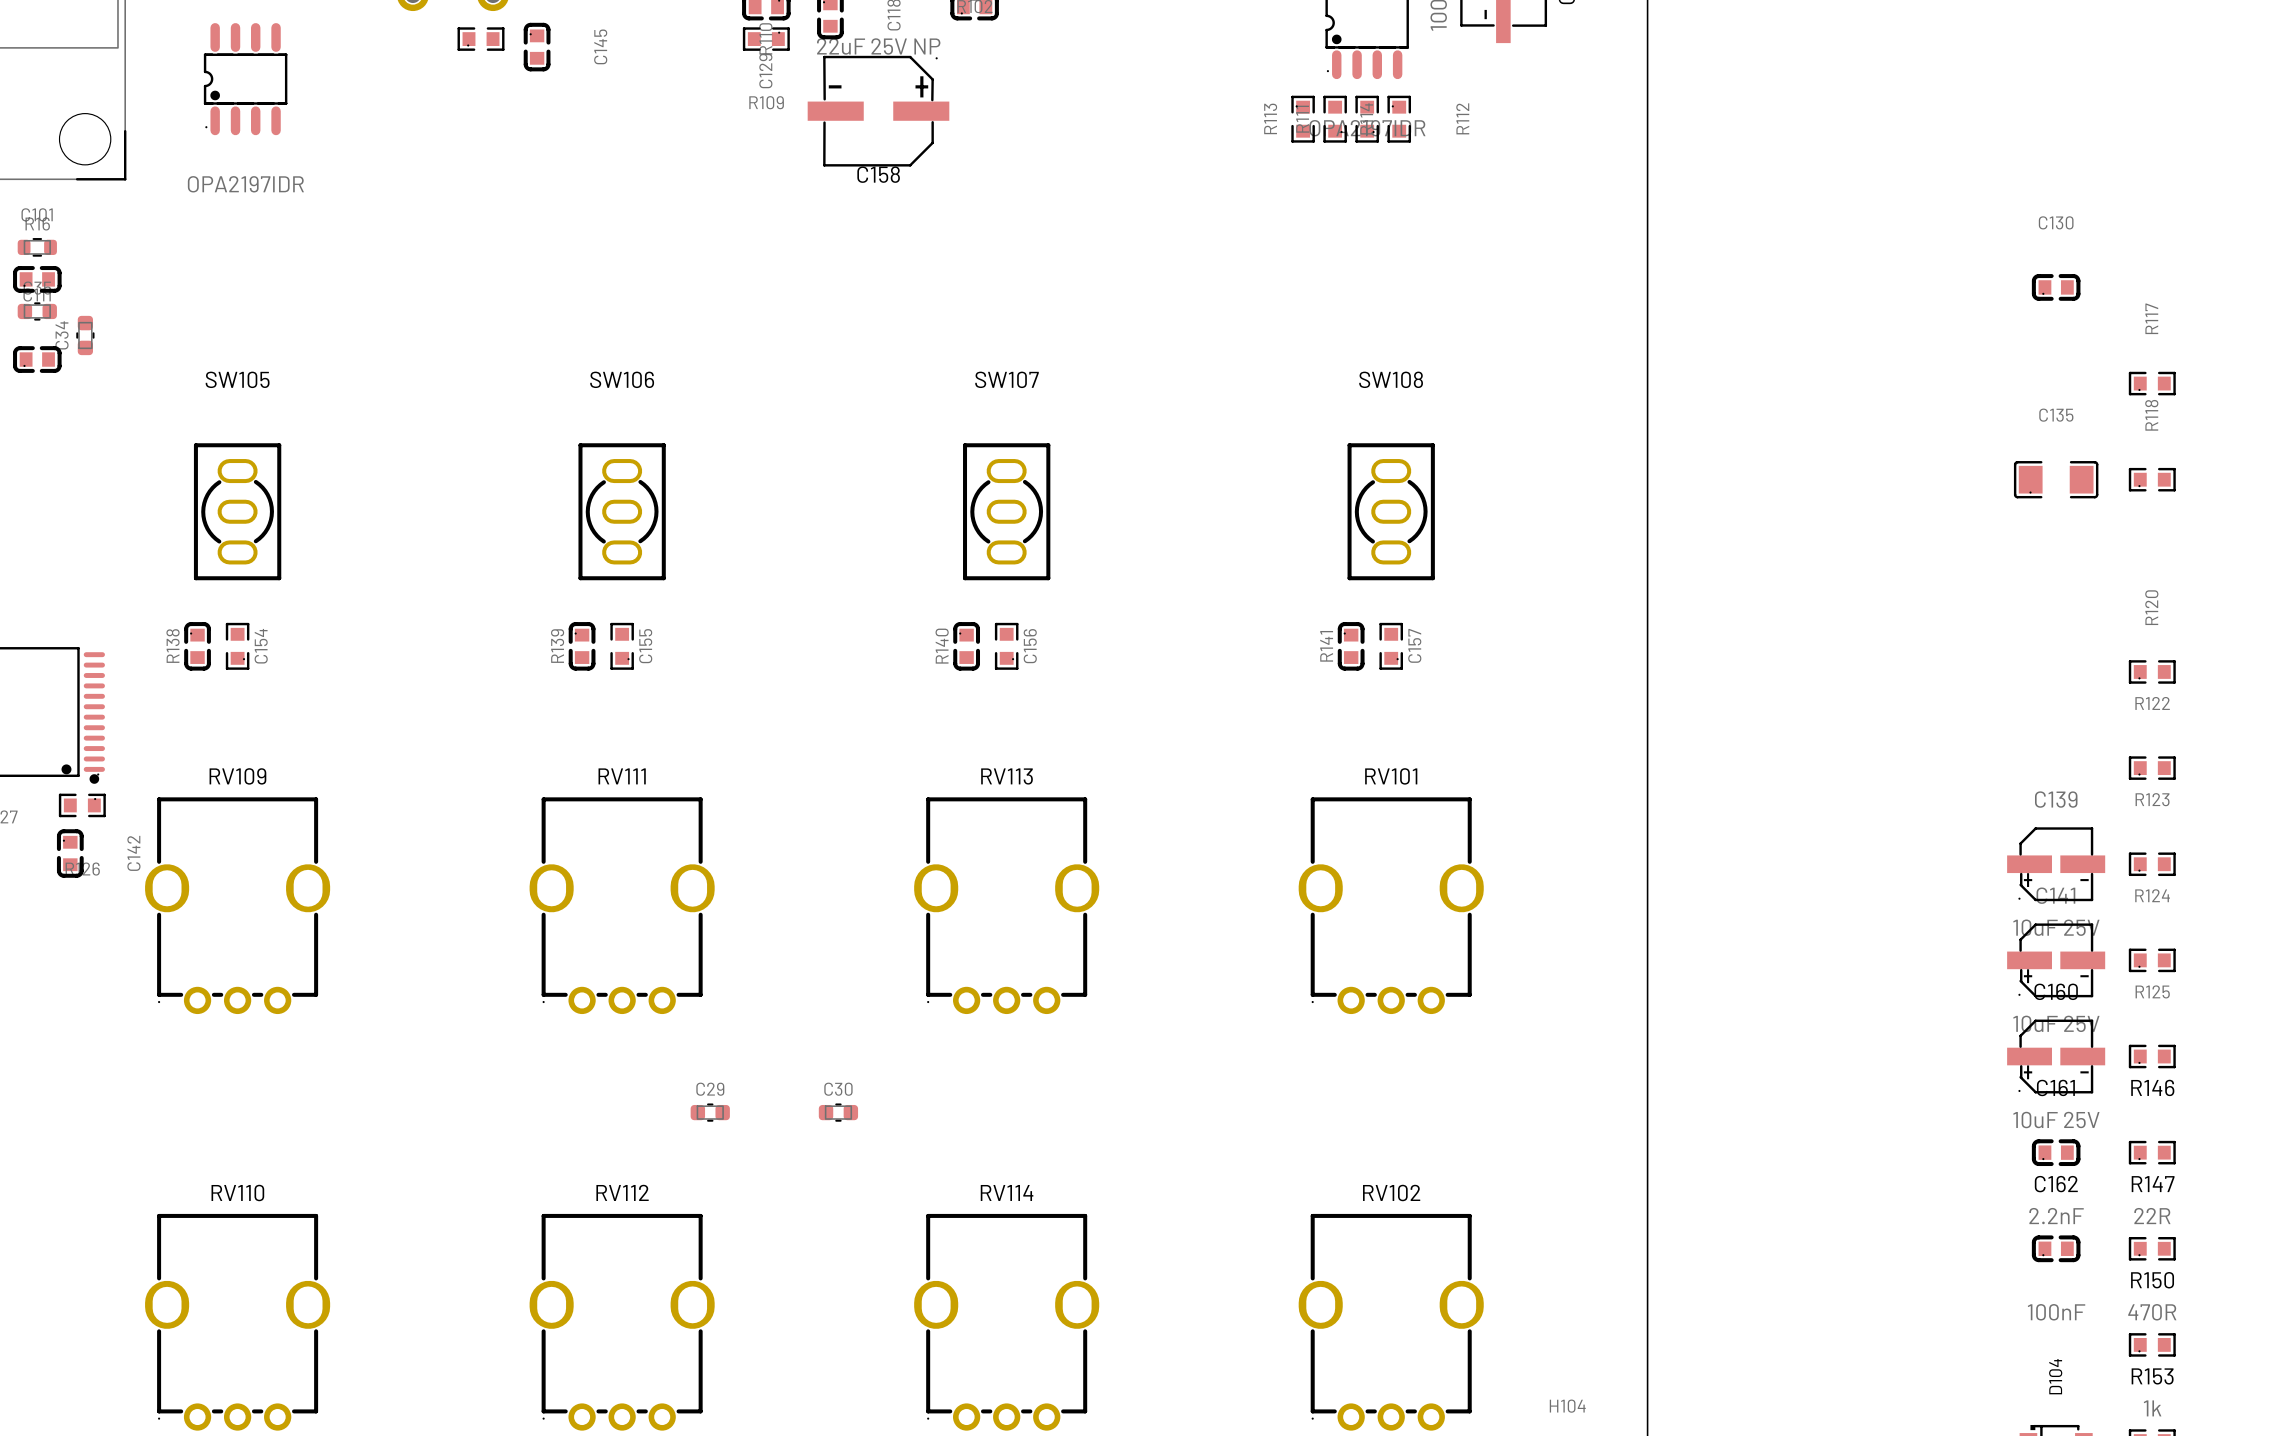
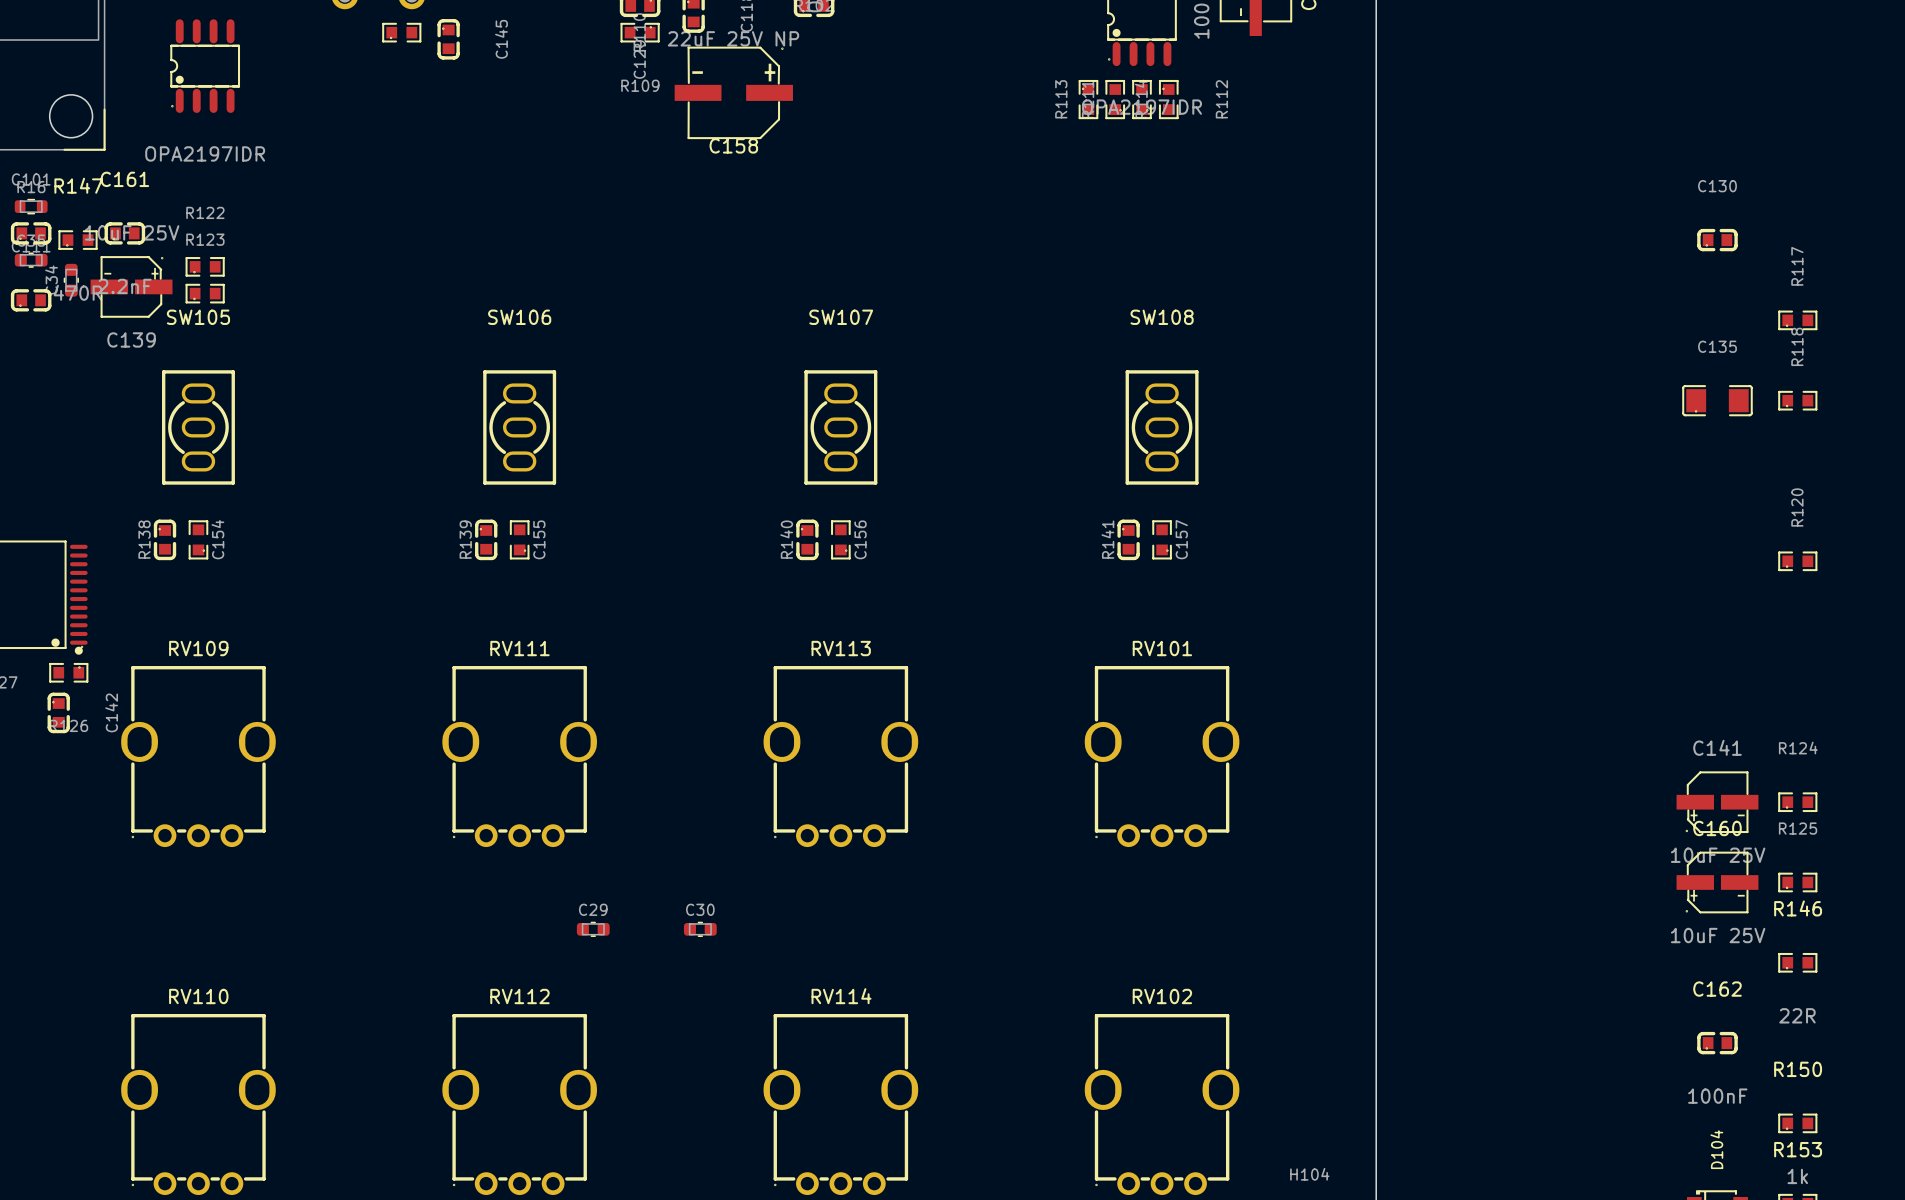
R122 position: (2152, 768) -> (205, 266)
C139 rotation: 0° (2056, 864) -> 180° (131, 286)
C139 position: (2056, 864) -> (131, 286)
R123 position: (2152, 864) -> (205, 293)
C161 position: (2056, 1152) -> (124, 233)
R147 position: (2152, 1248) -> (78, 240)

